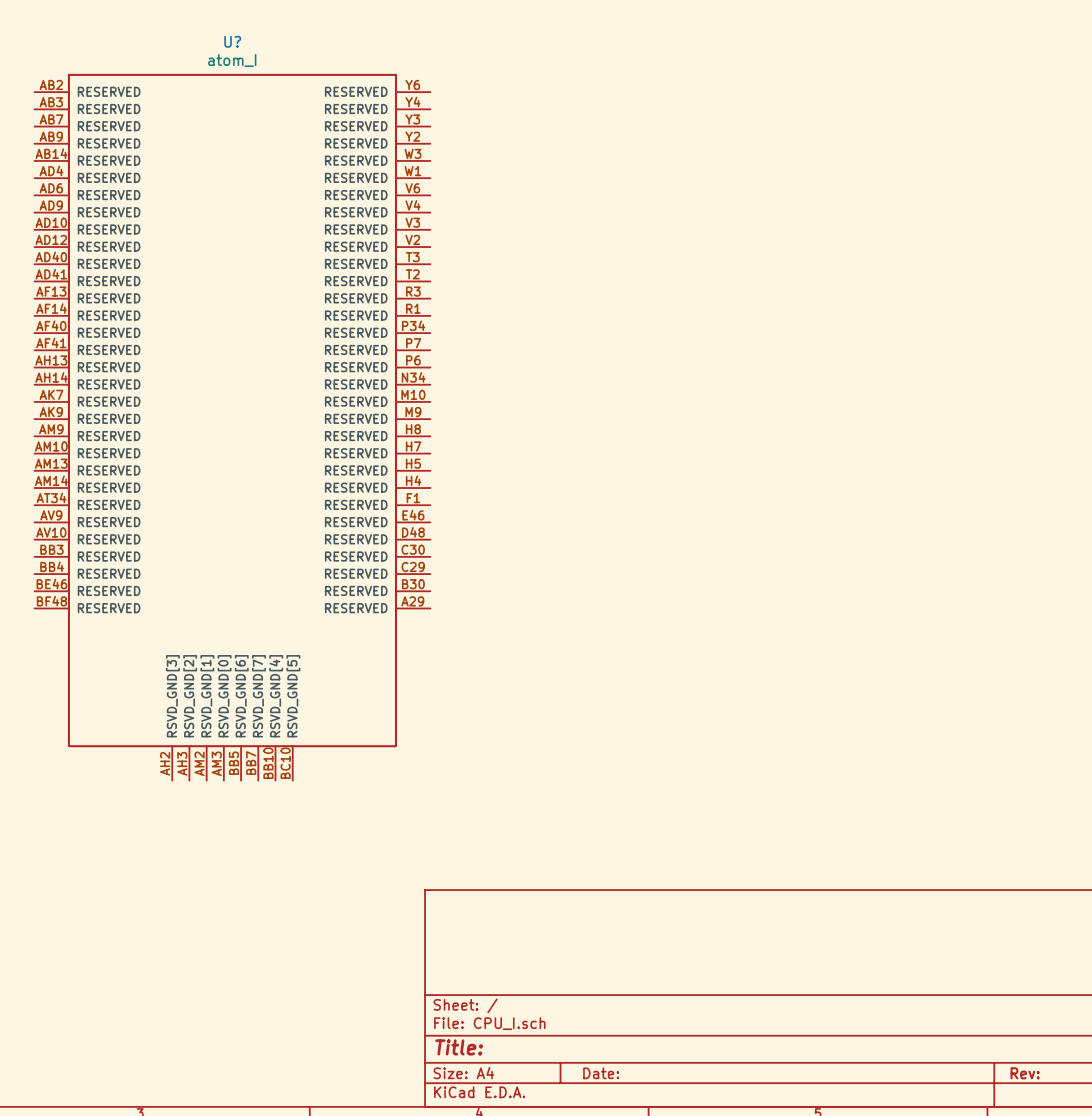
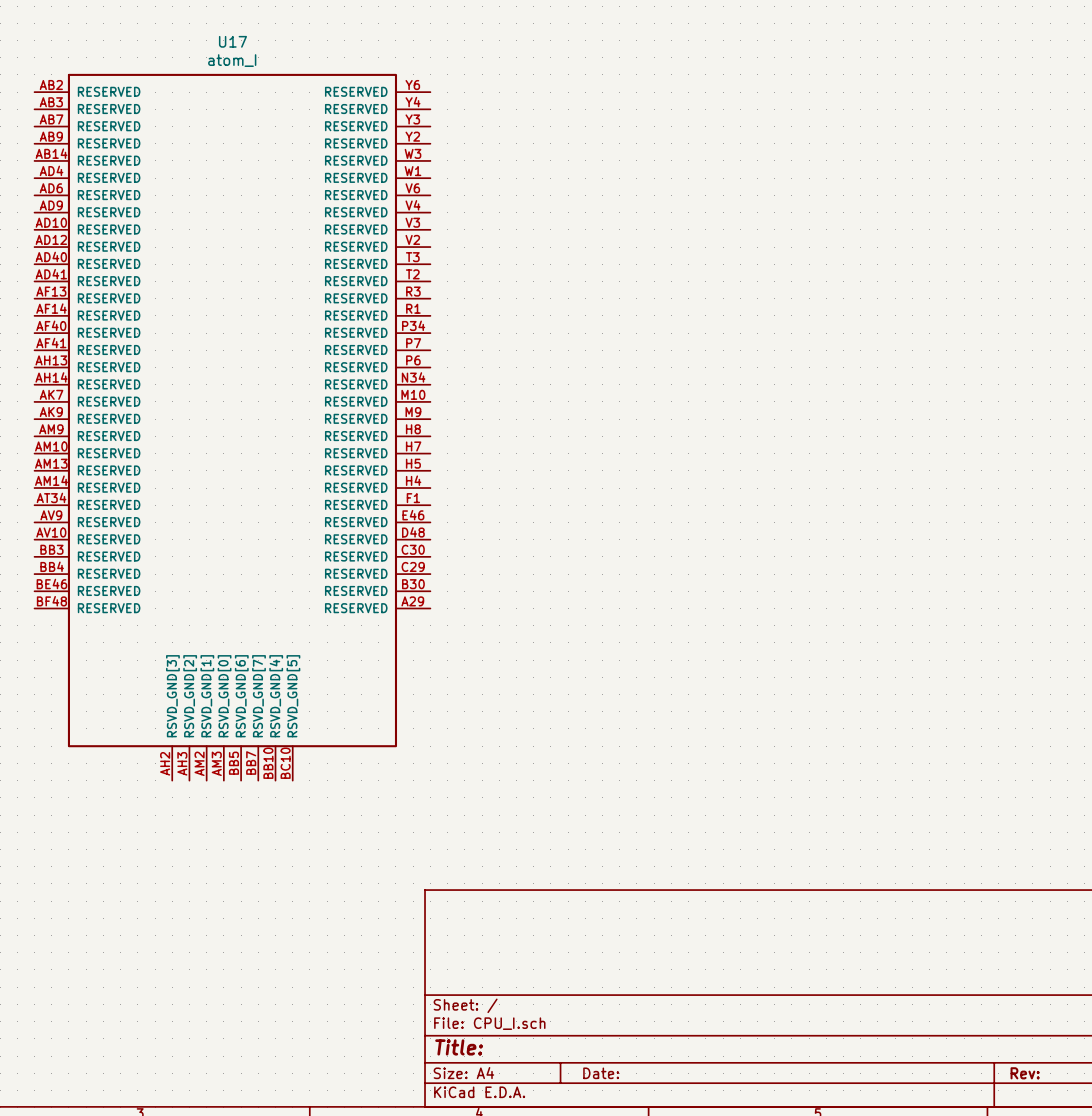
U? name: U? (232, 41) -> U17 (232, 41)

